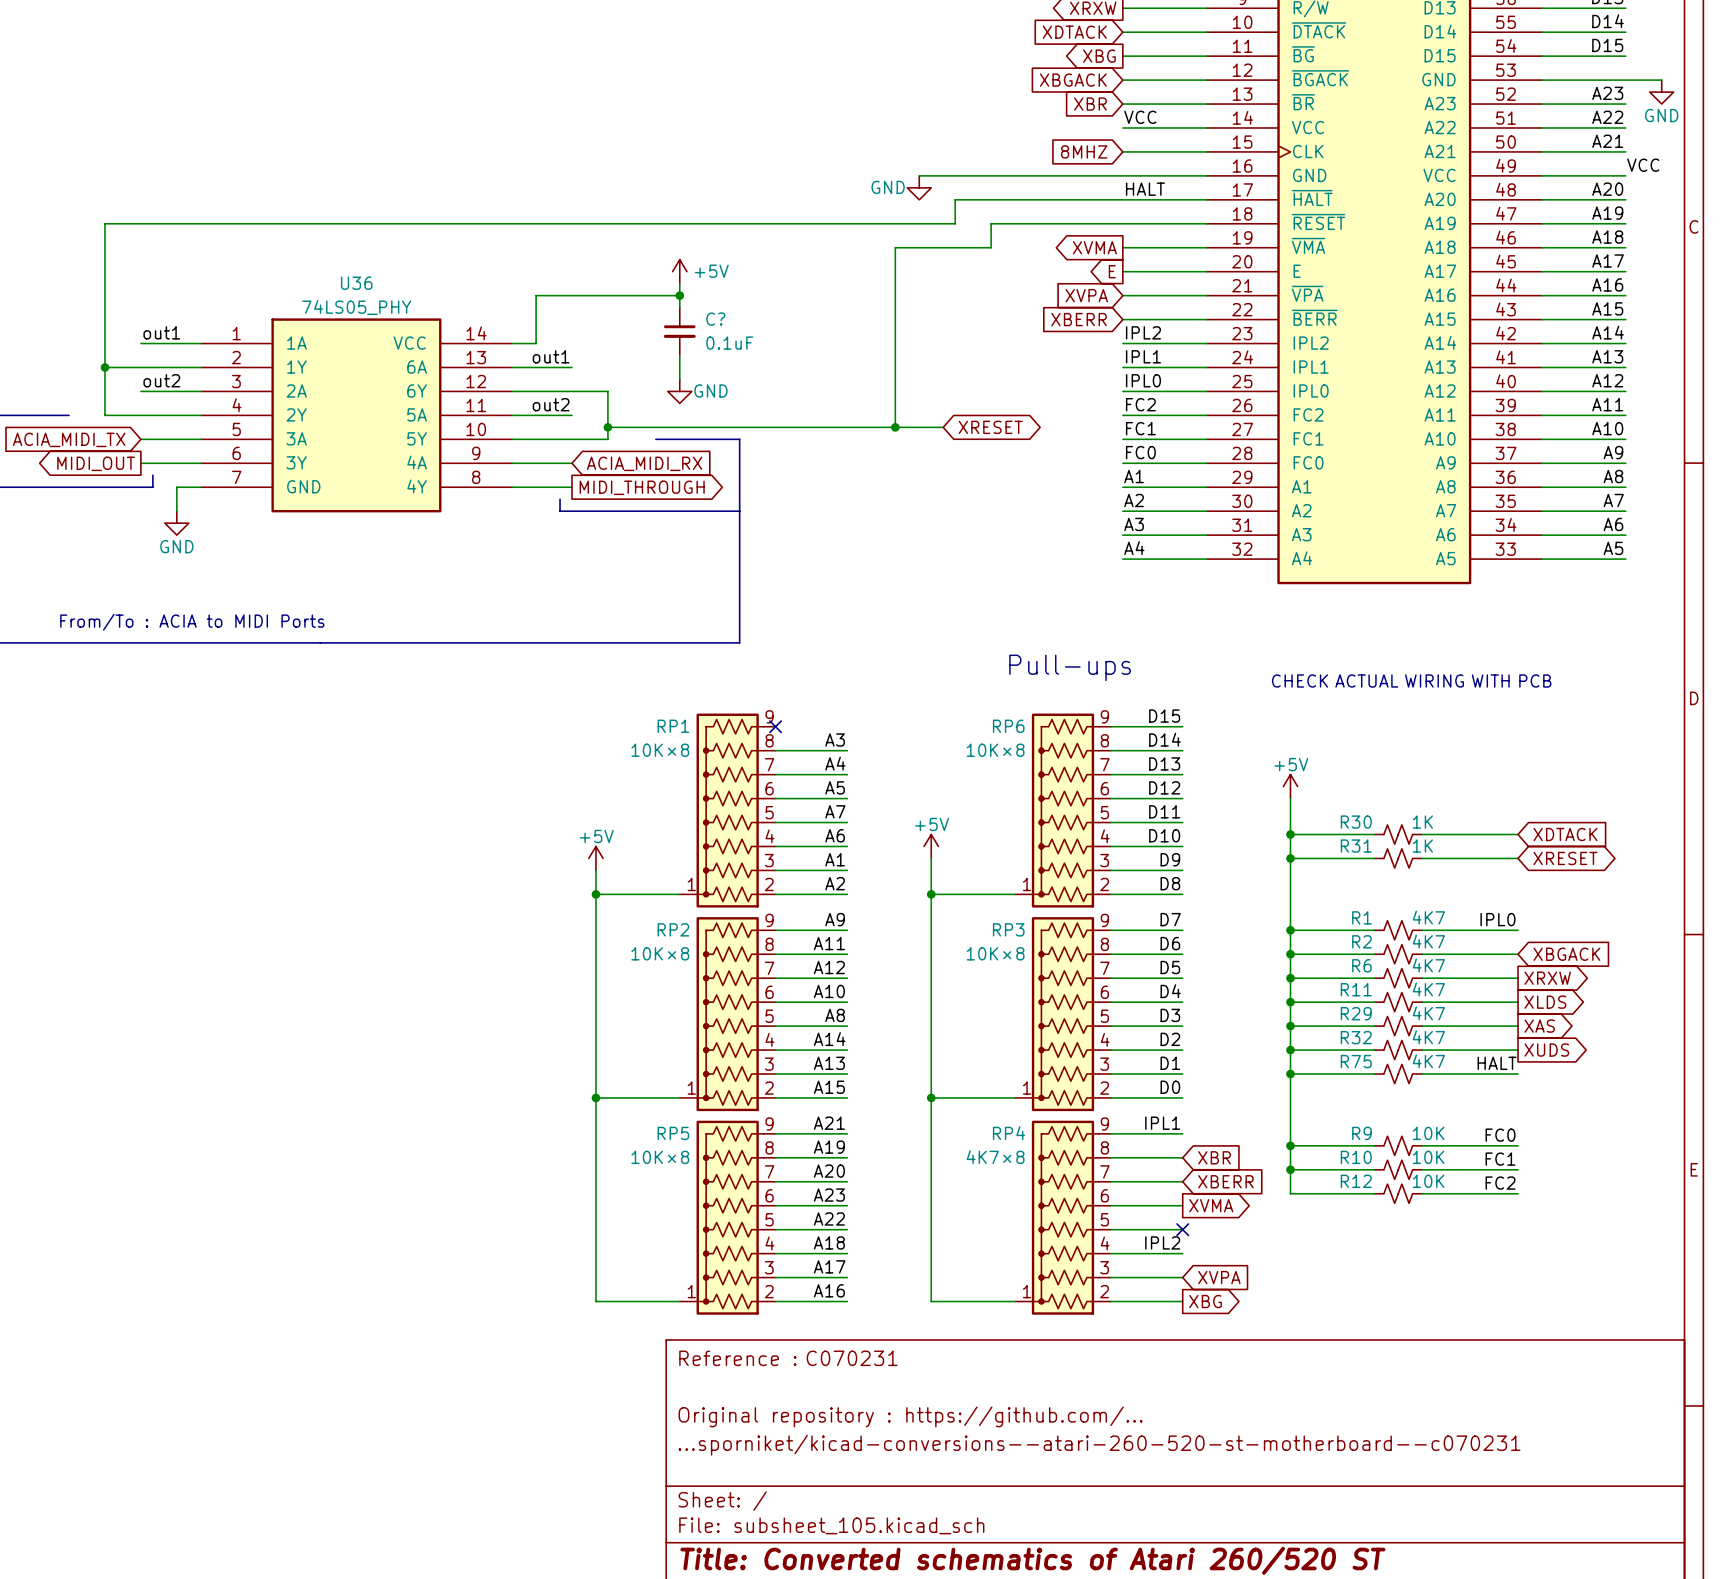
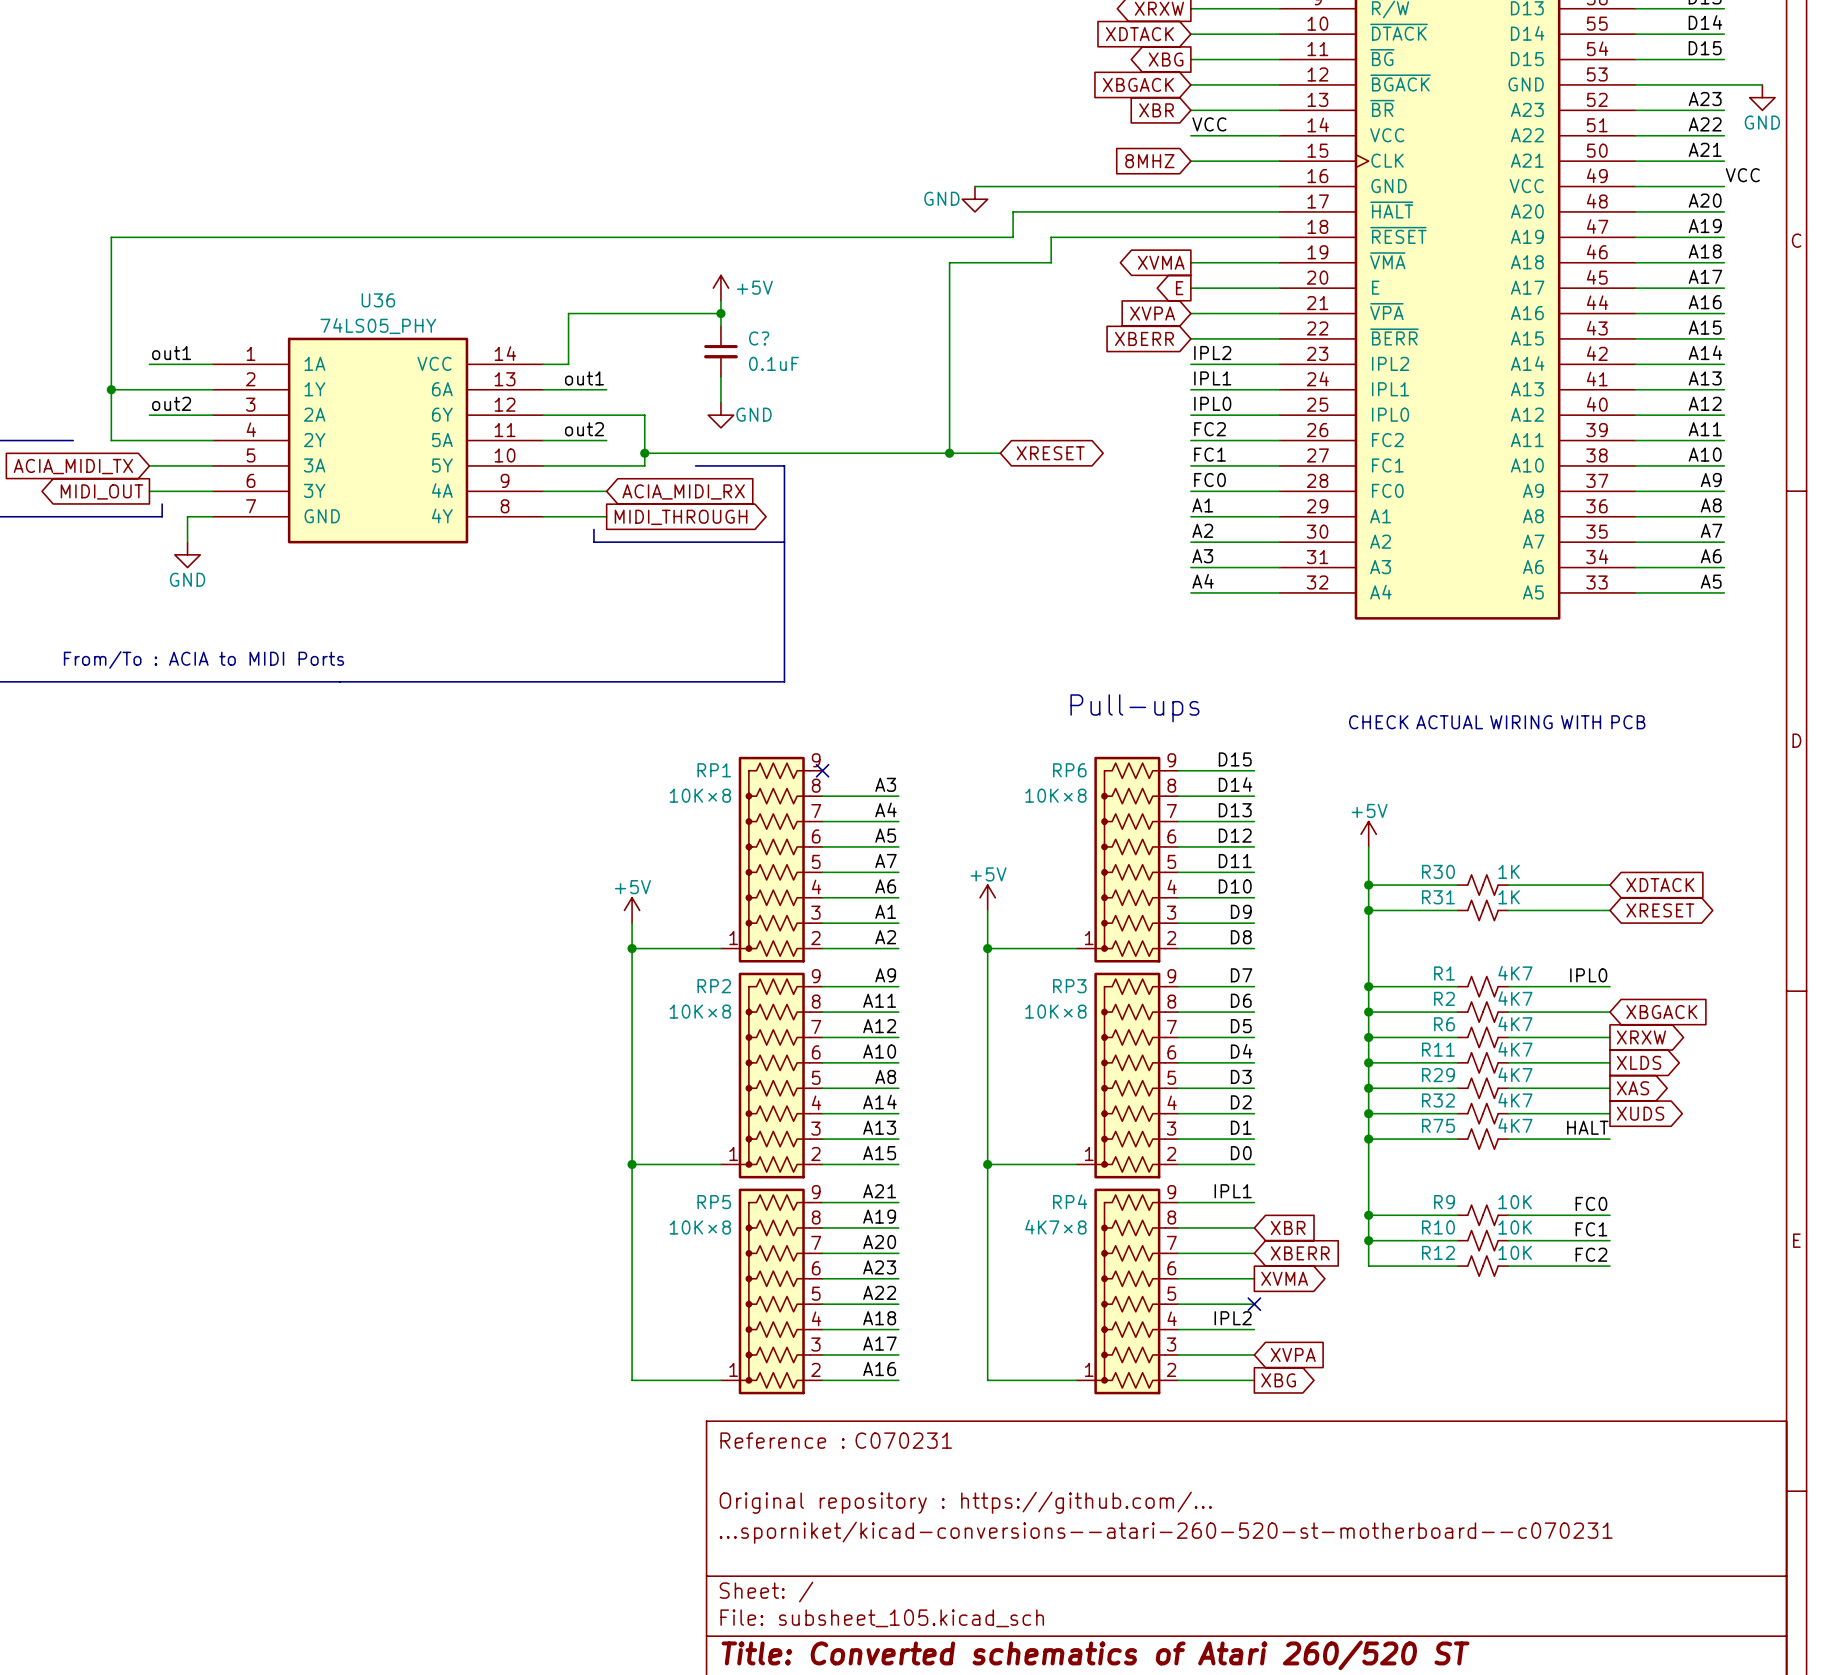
label: HALT (1145, 189) -> none

